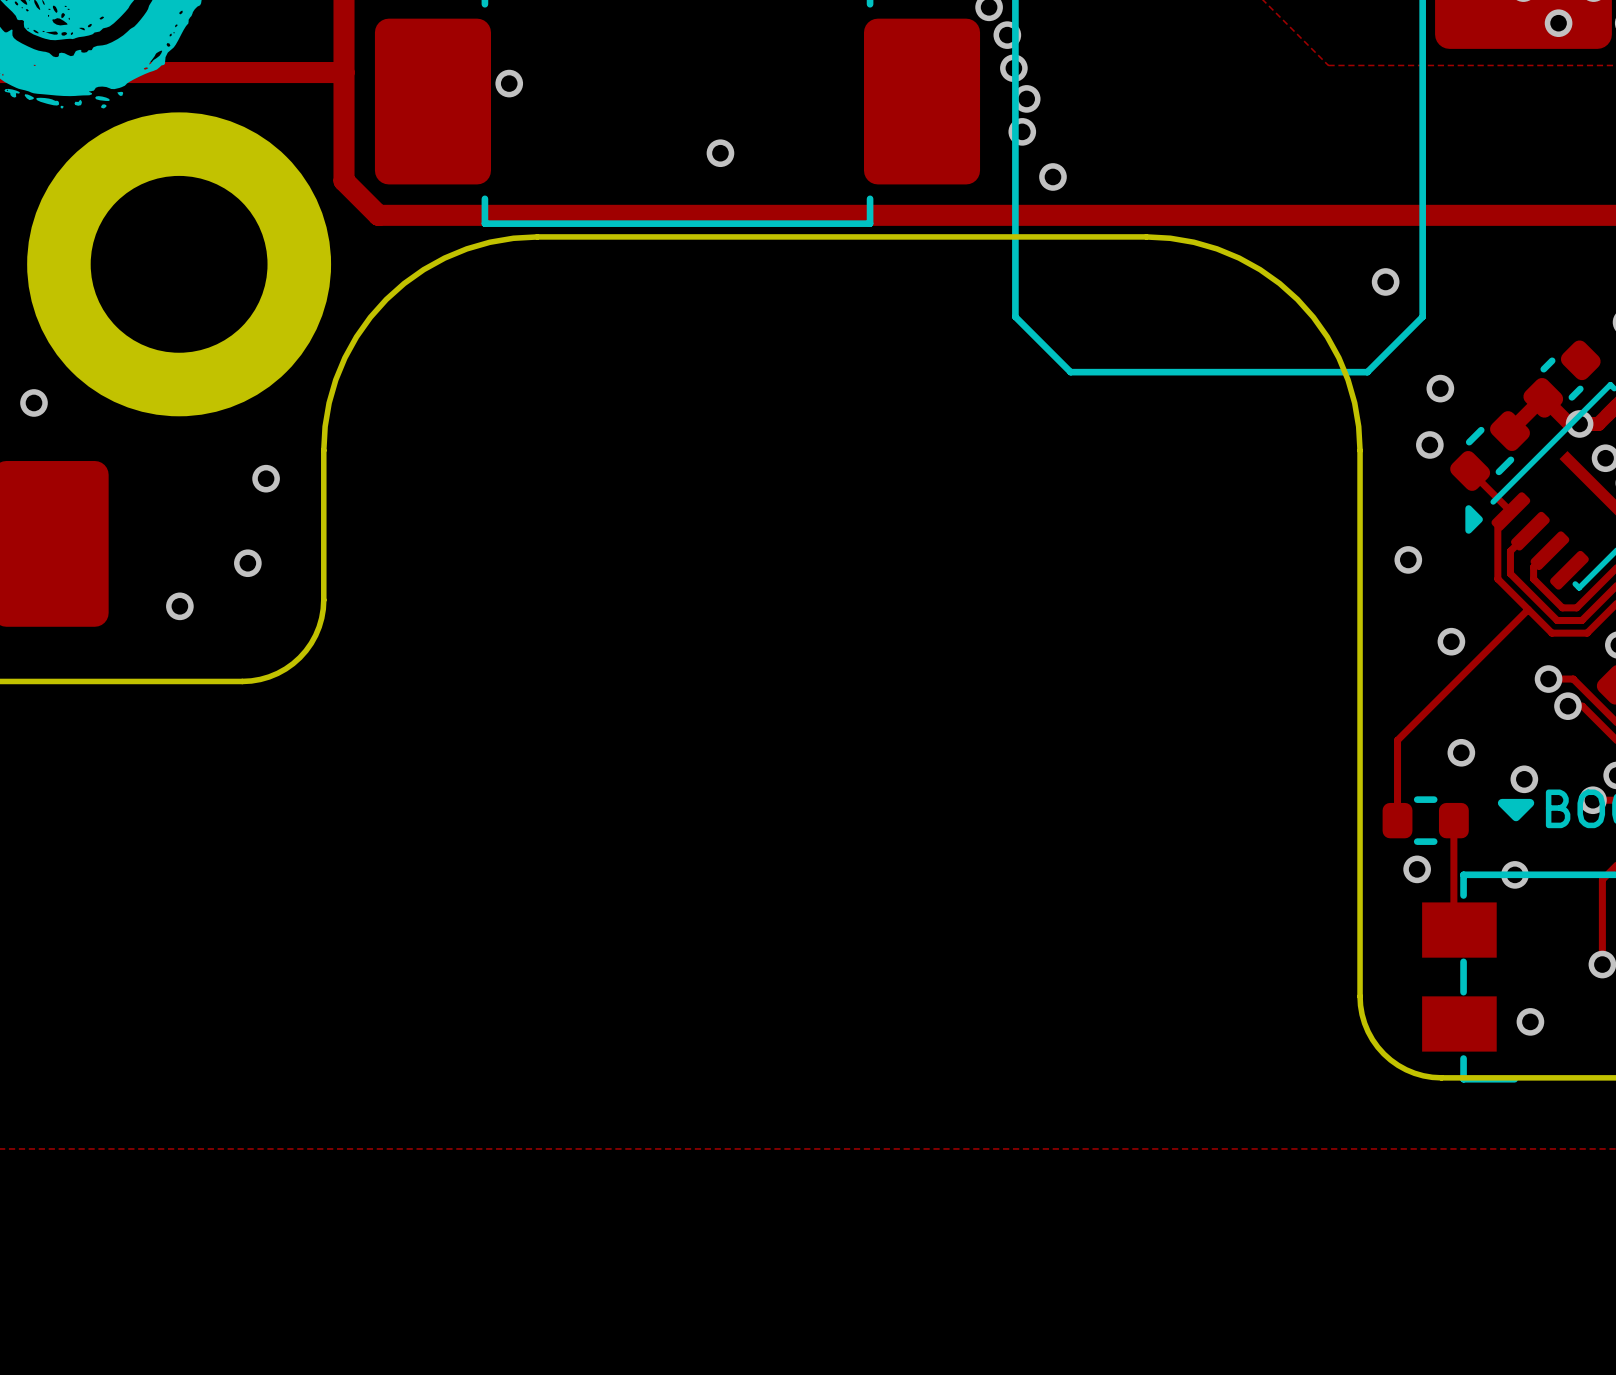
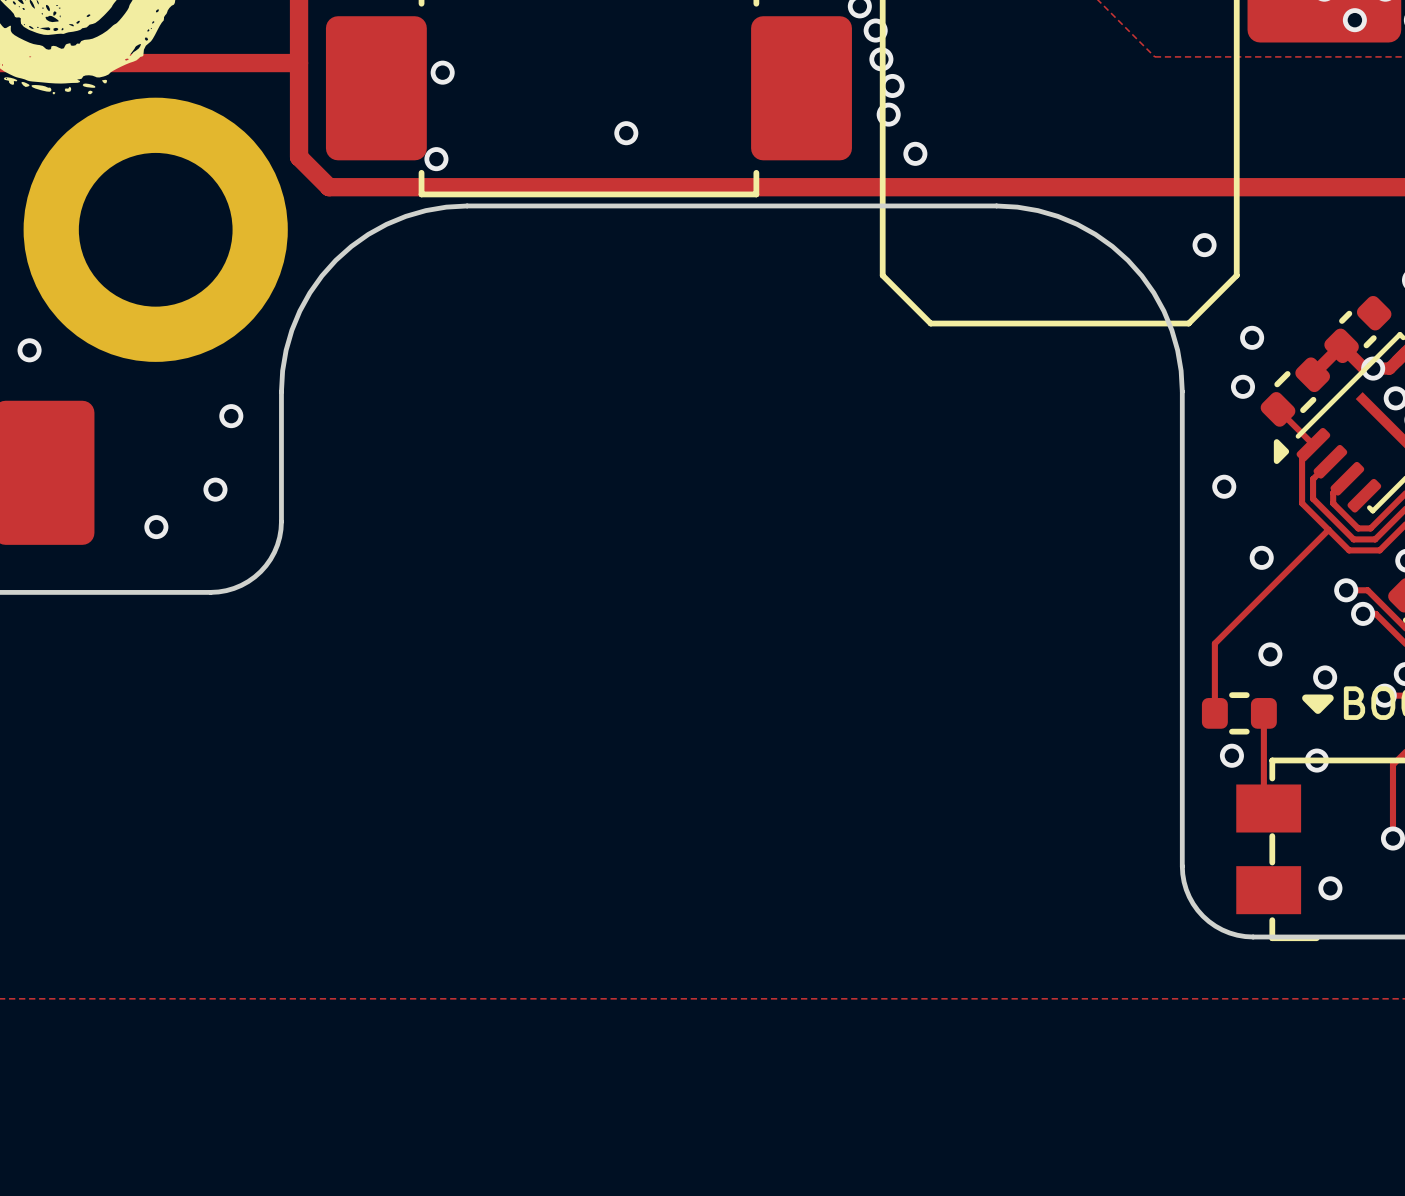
via: none -> (436, 159)

